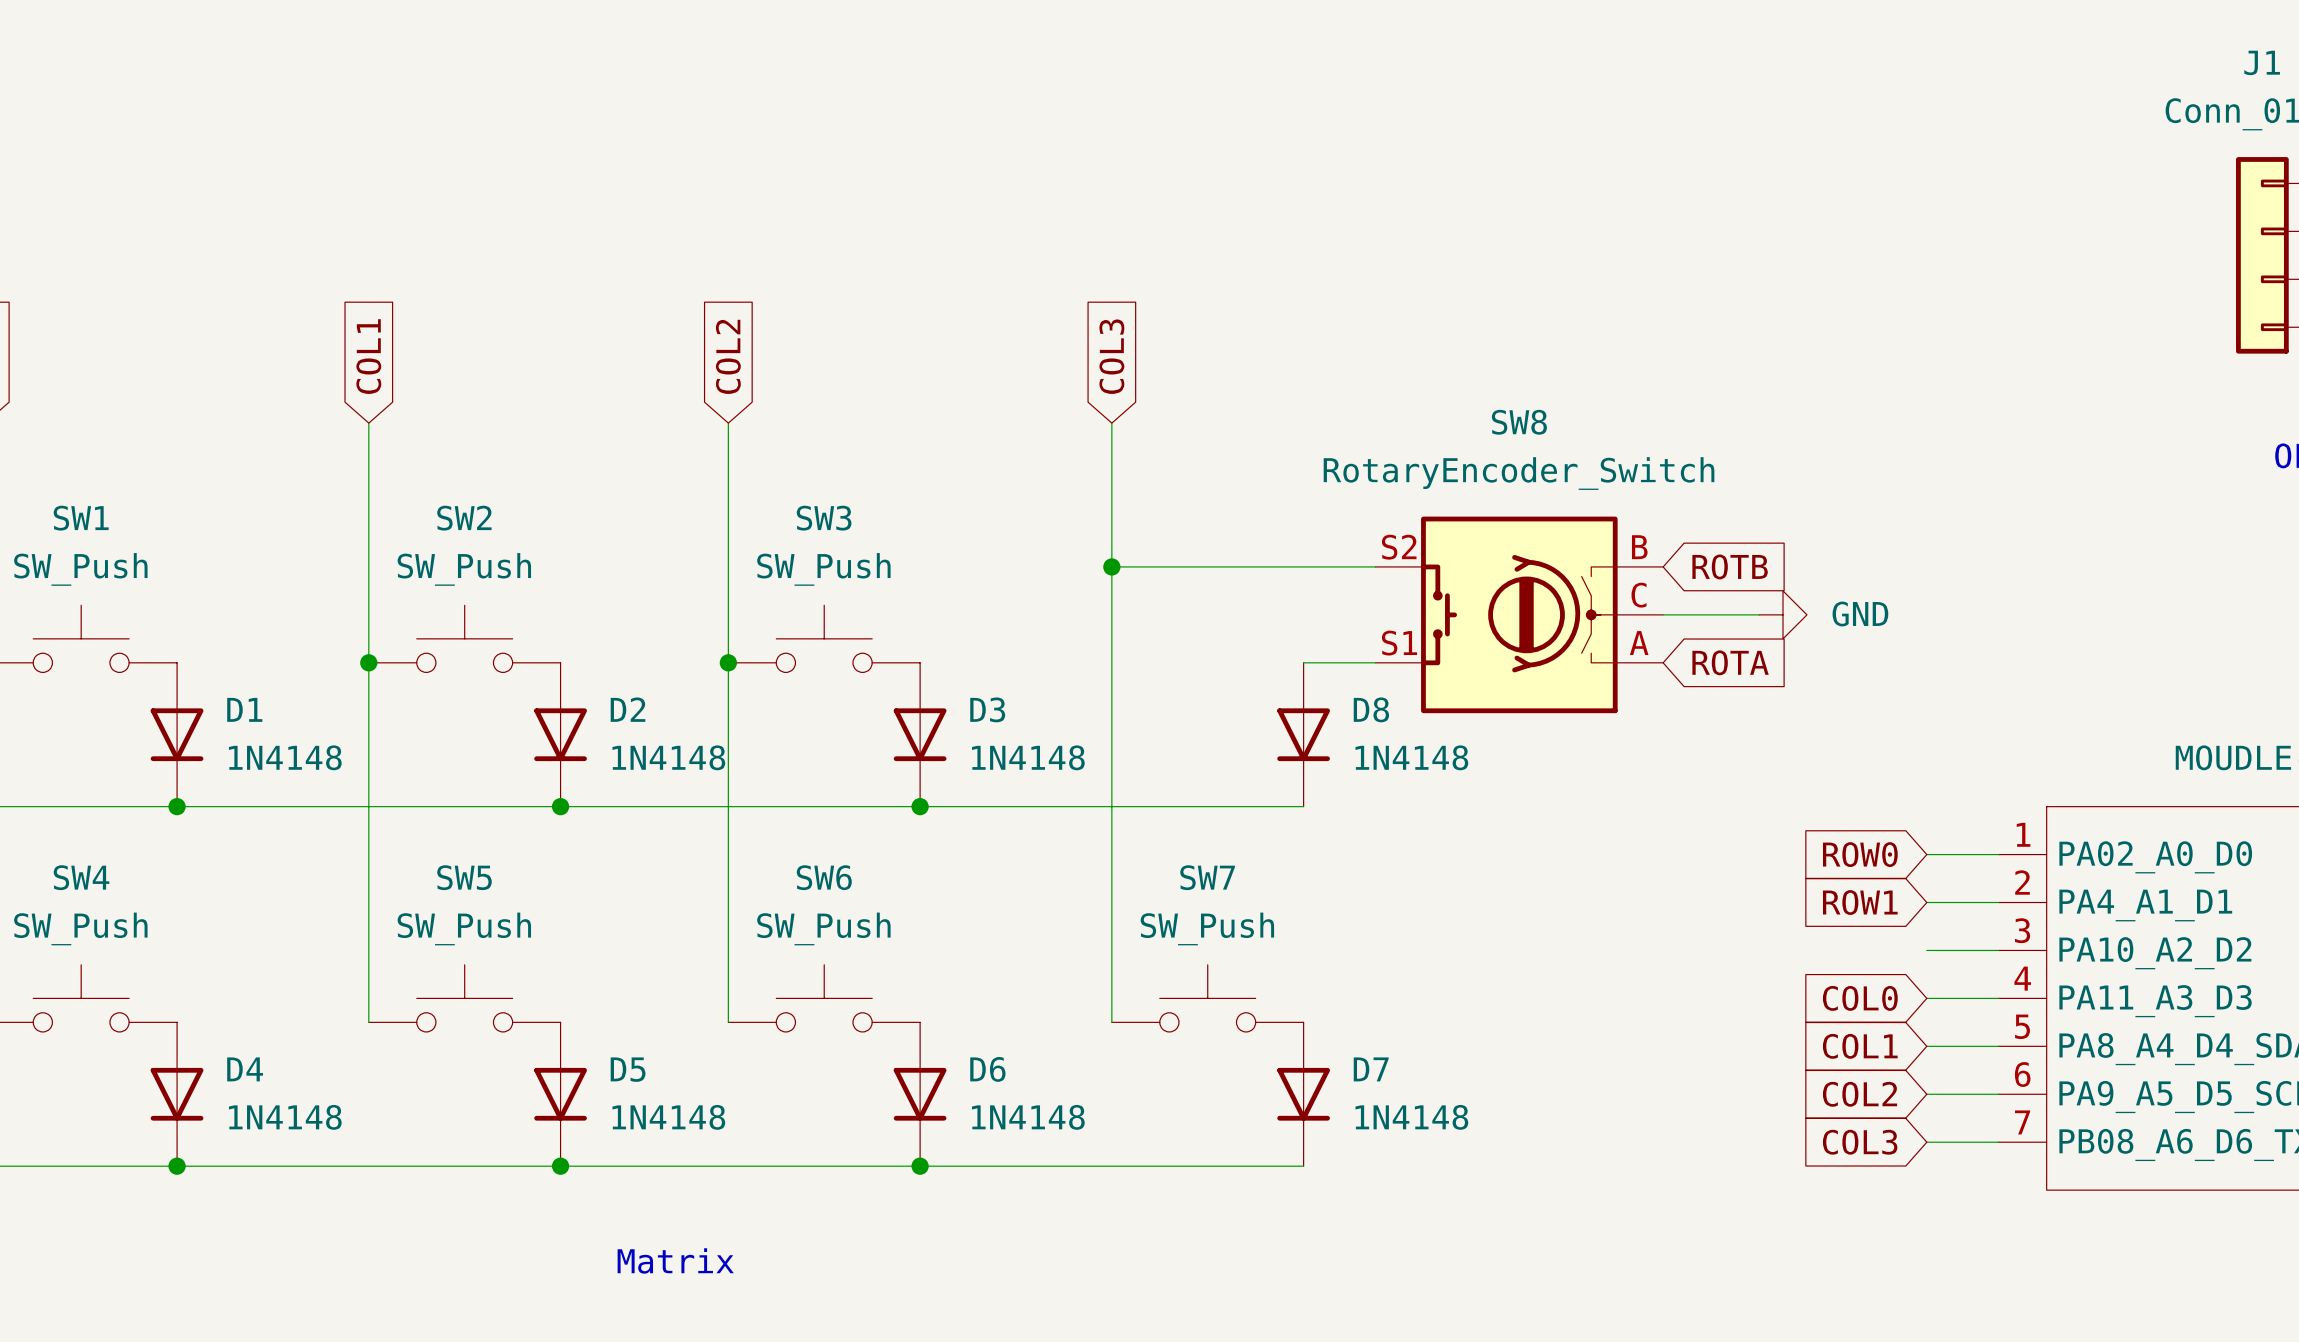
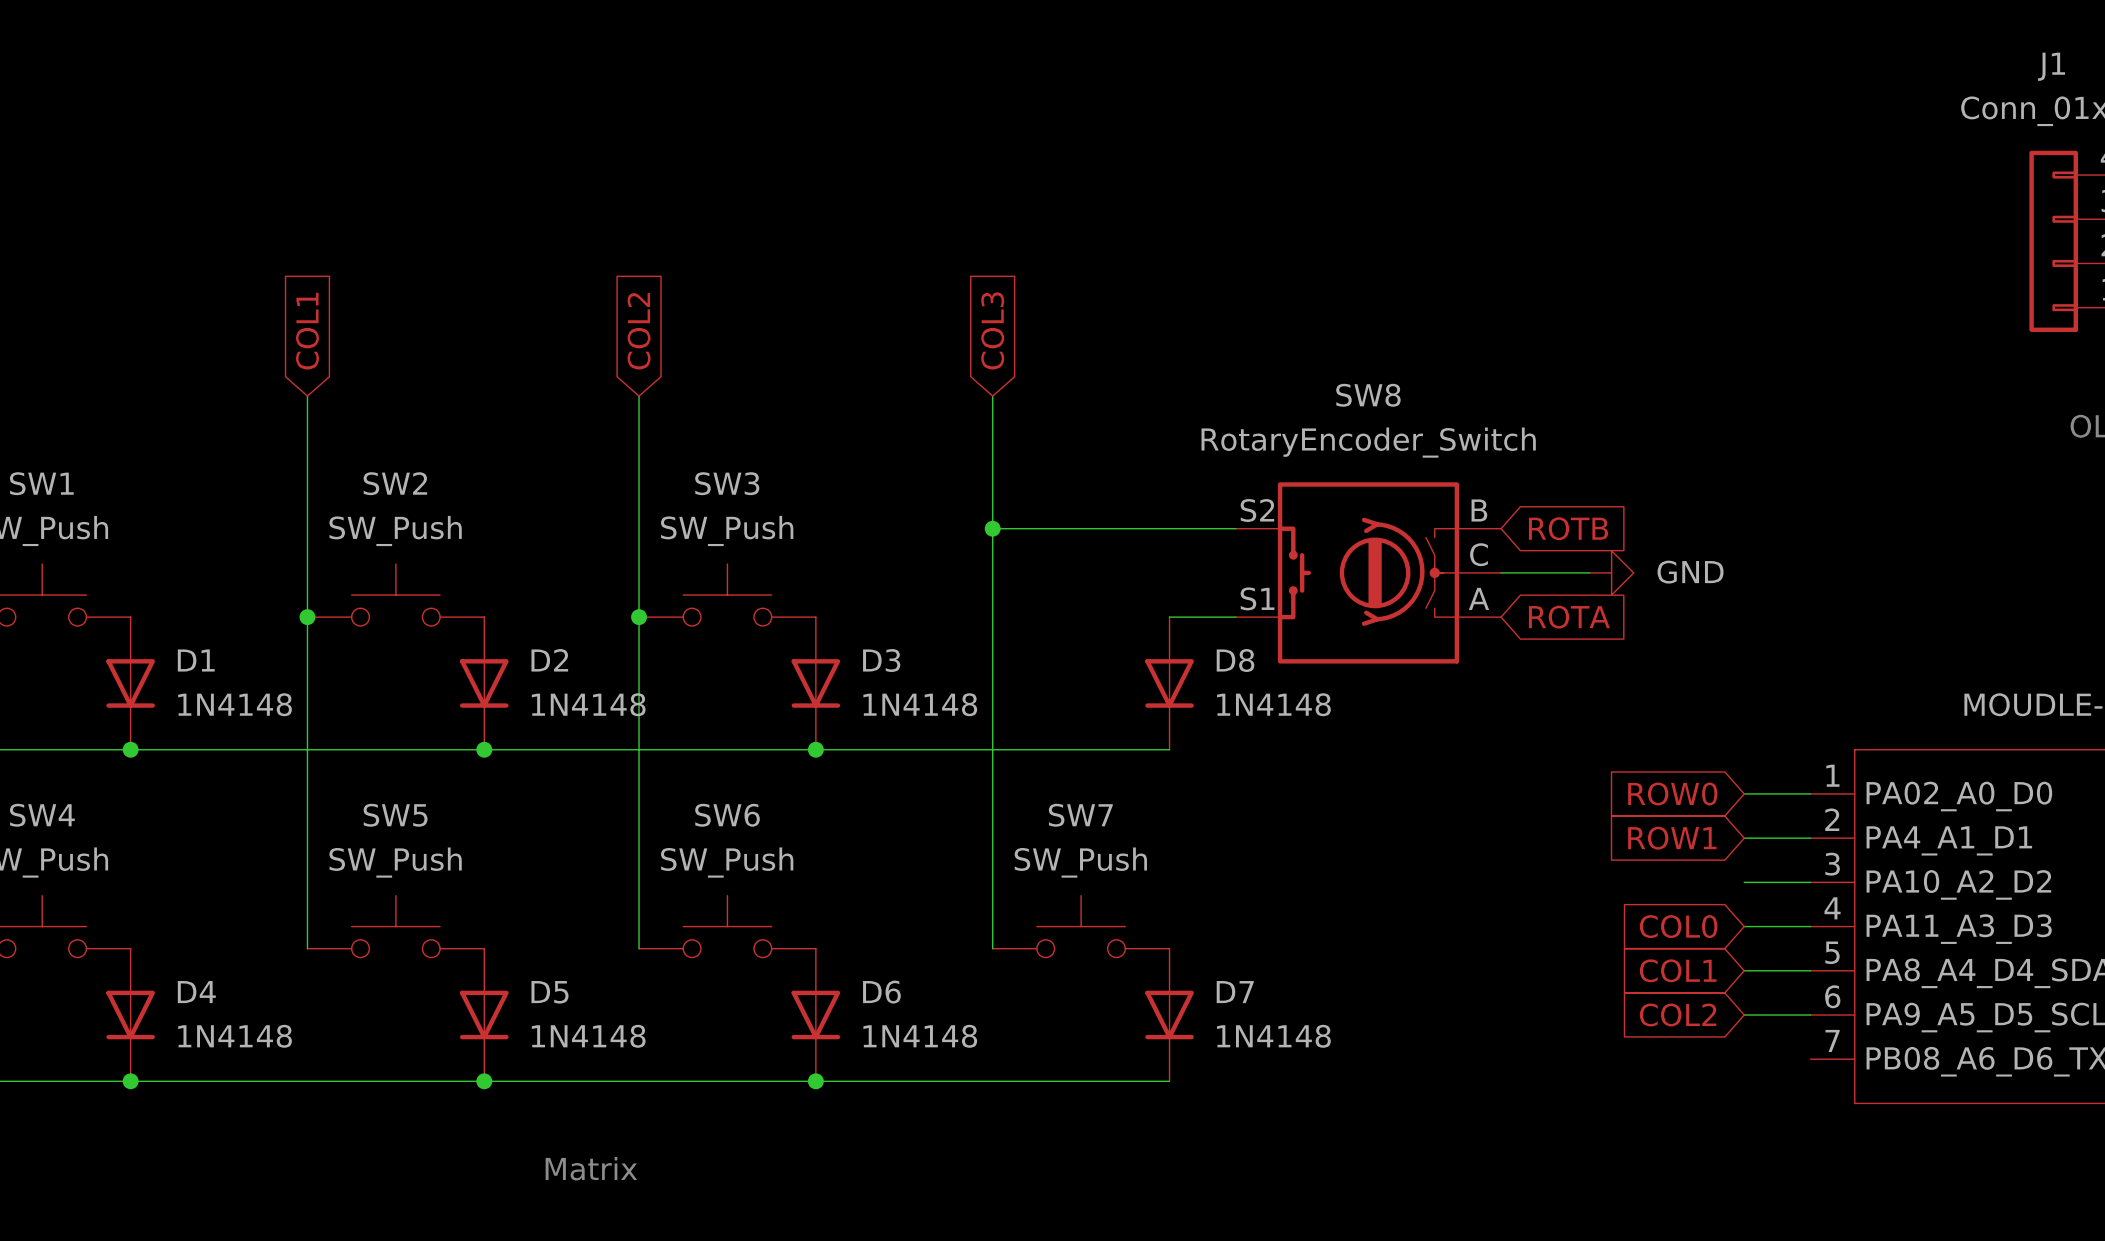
global label: COL3 (1860, 1142) -> none
wire: (1926, 1142) (1998, 1142) -> none

